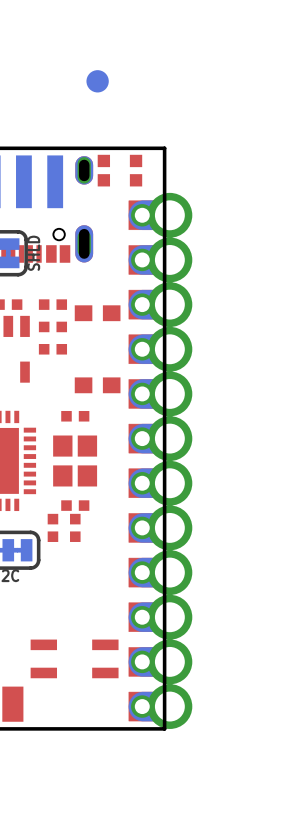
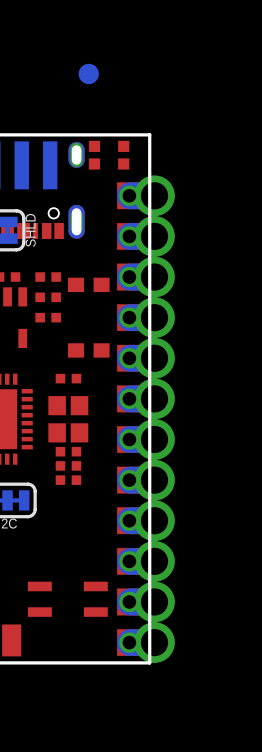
part: none -> (68, 451)
part: (75, 505) -> none
part: none -> (68, 465)
part: (52, 527) -> none
part rotation: 0° (75, 527) -> 90° clockwise (68, 480)

